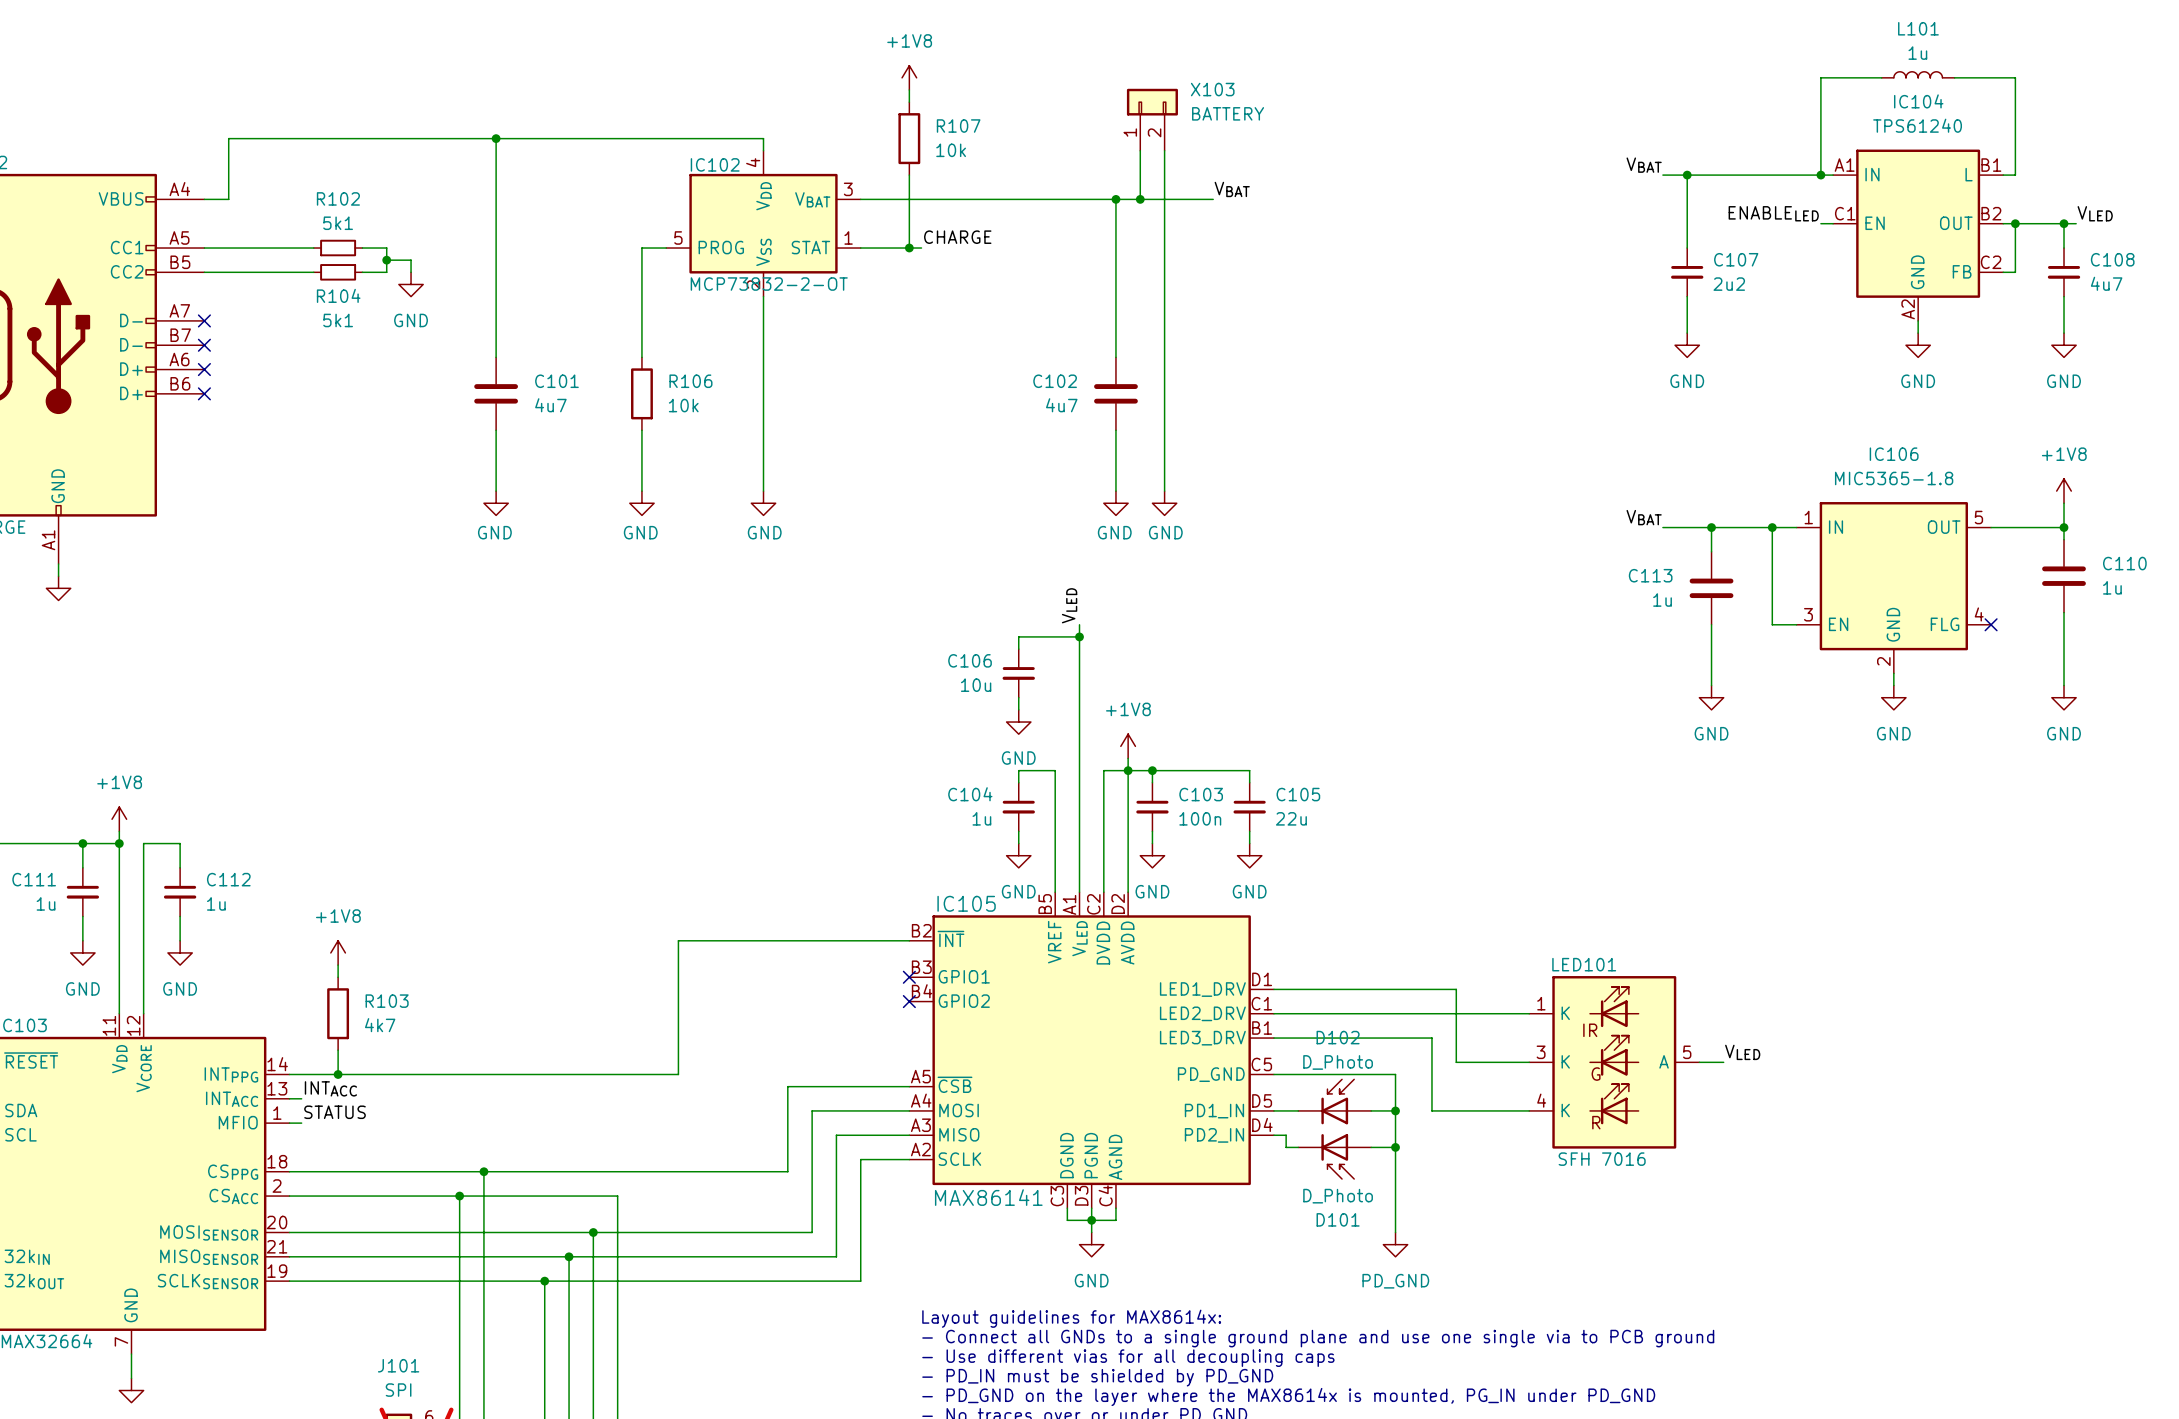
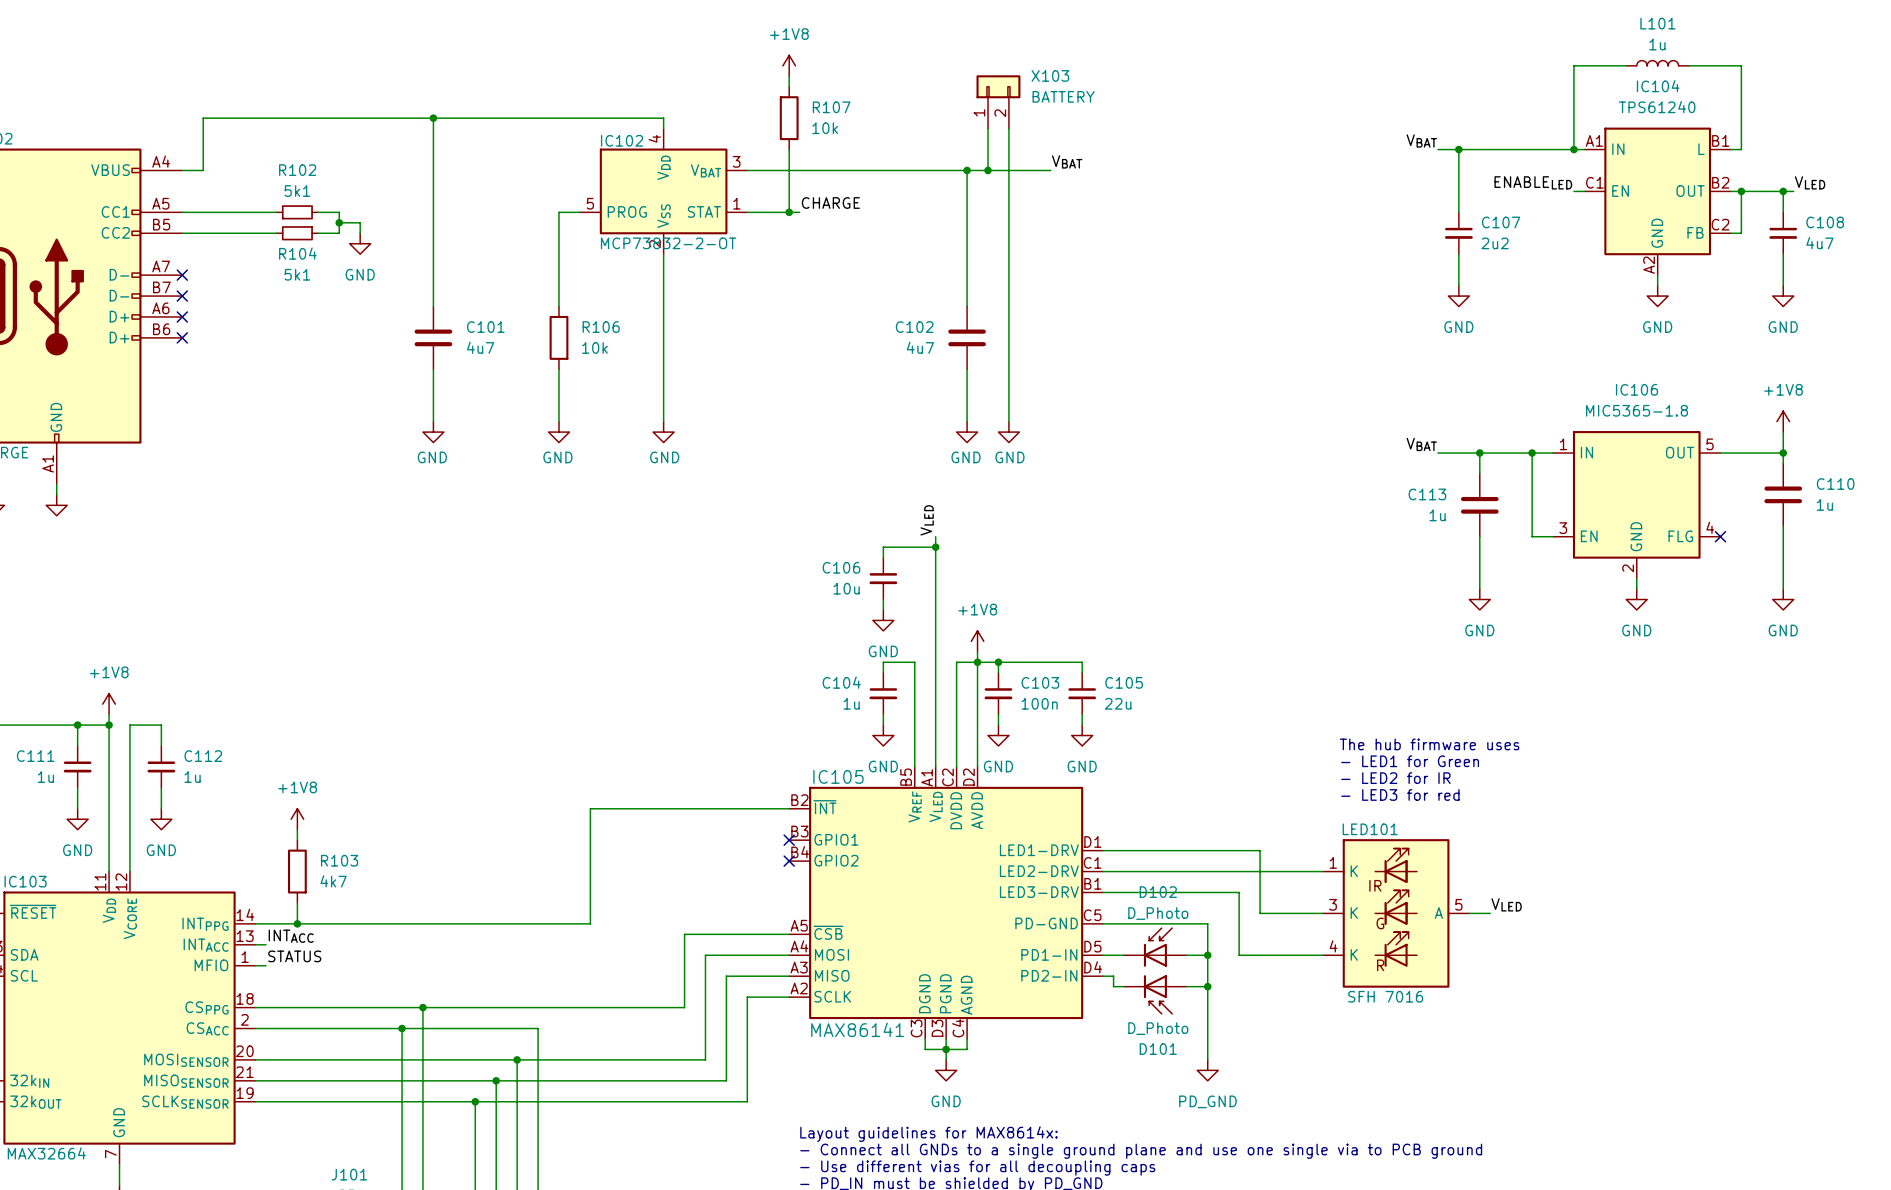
text: none -> The hub firmware uses (1429, 744)
text: none -> - LED1 for Green (1410, 761)
IC105 symbol: [909, 892, 1274, 1209] -> [789, 766, 1104, 1039]
text: none -> - LED2 for IR (1395, 778)
text: none -> - LED3 for red (1400, 794)

